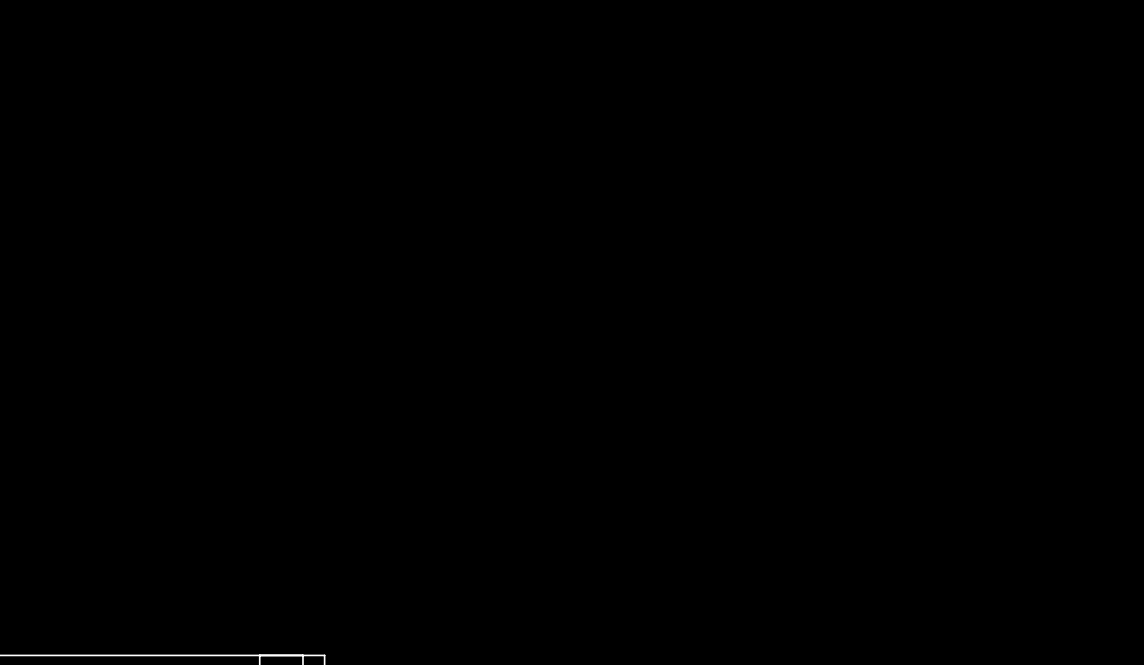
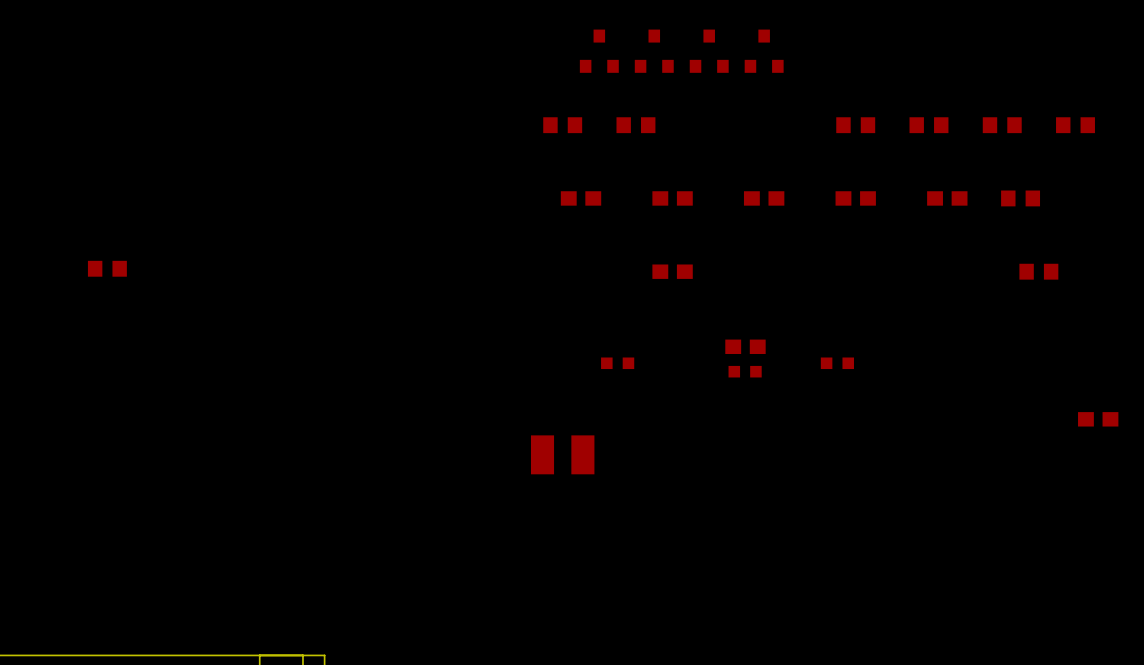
part: none -> (599, 51)
part: none -> (654, 51)
part: none -> (709, 51)
part: none -> (764, 51)
part: none -> (562, 125)
part: none -> (635, 125)
part: none -> (855, 125)
part: none -> (928, 125)
part: none -> (1002, 125)
part: none -> (1075, 125)
part: none -> (581, 198)
part: none -> (672, 198)
part: none -> (764, 198)
part: none -> (855, 198)
part: none -> (947, 198)
part: none -> (1020, 198)
part: none -> (107, 268)
part: none -> (672, 271)
part: none -> (1038, 271)
part: none -> (745, 346)
part: none -> (617, 363)
part: none -> (837, 363)
part: none -> (745, 371)
part: none -> (1098, 419)
part: none -> (562, 454)

